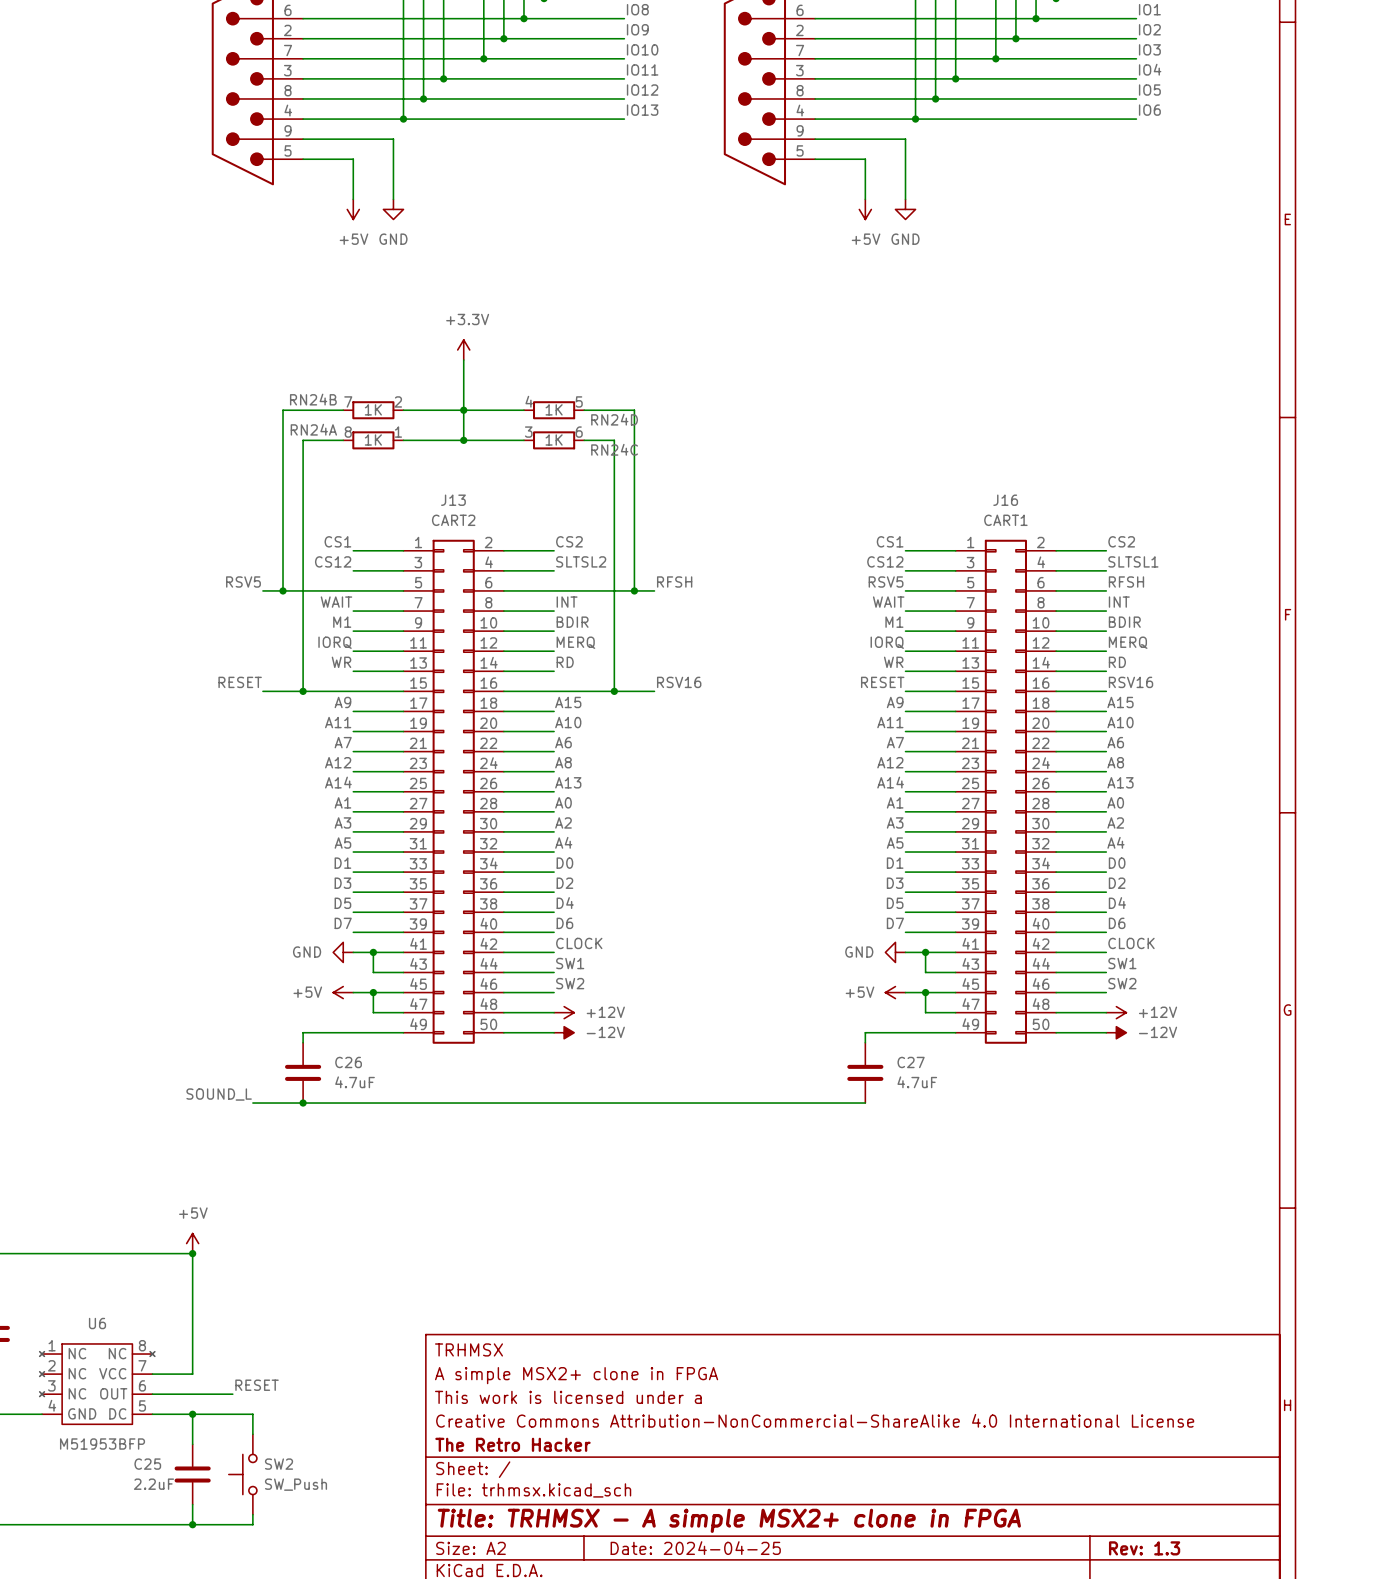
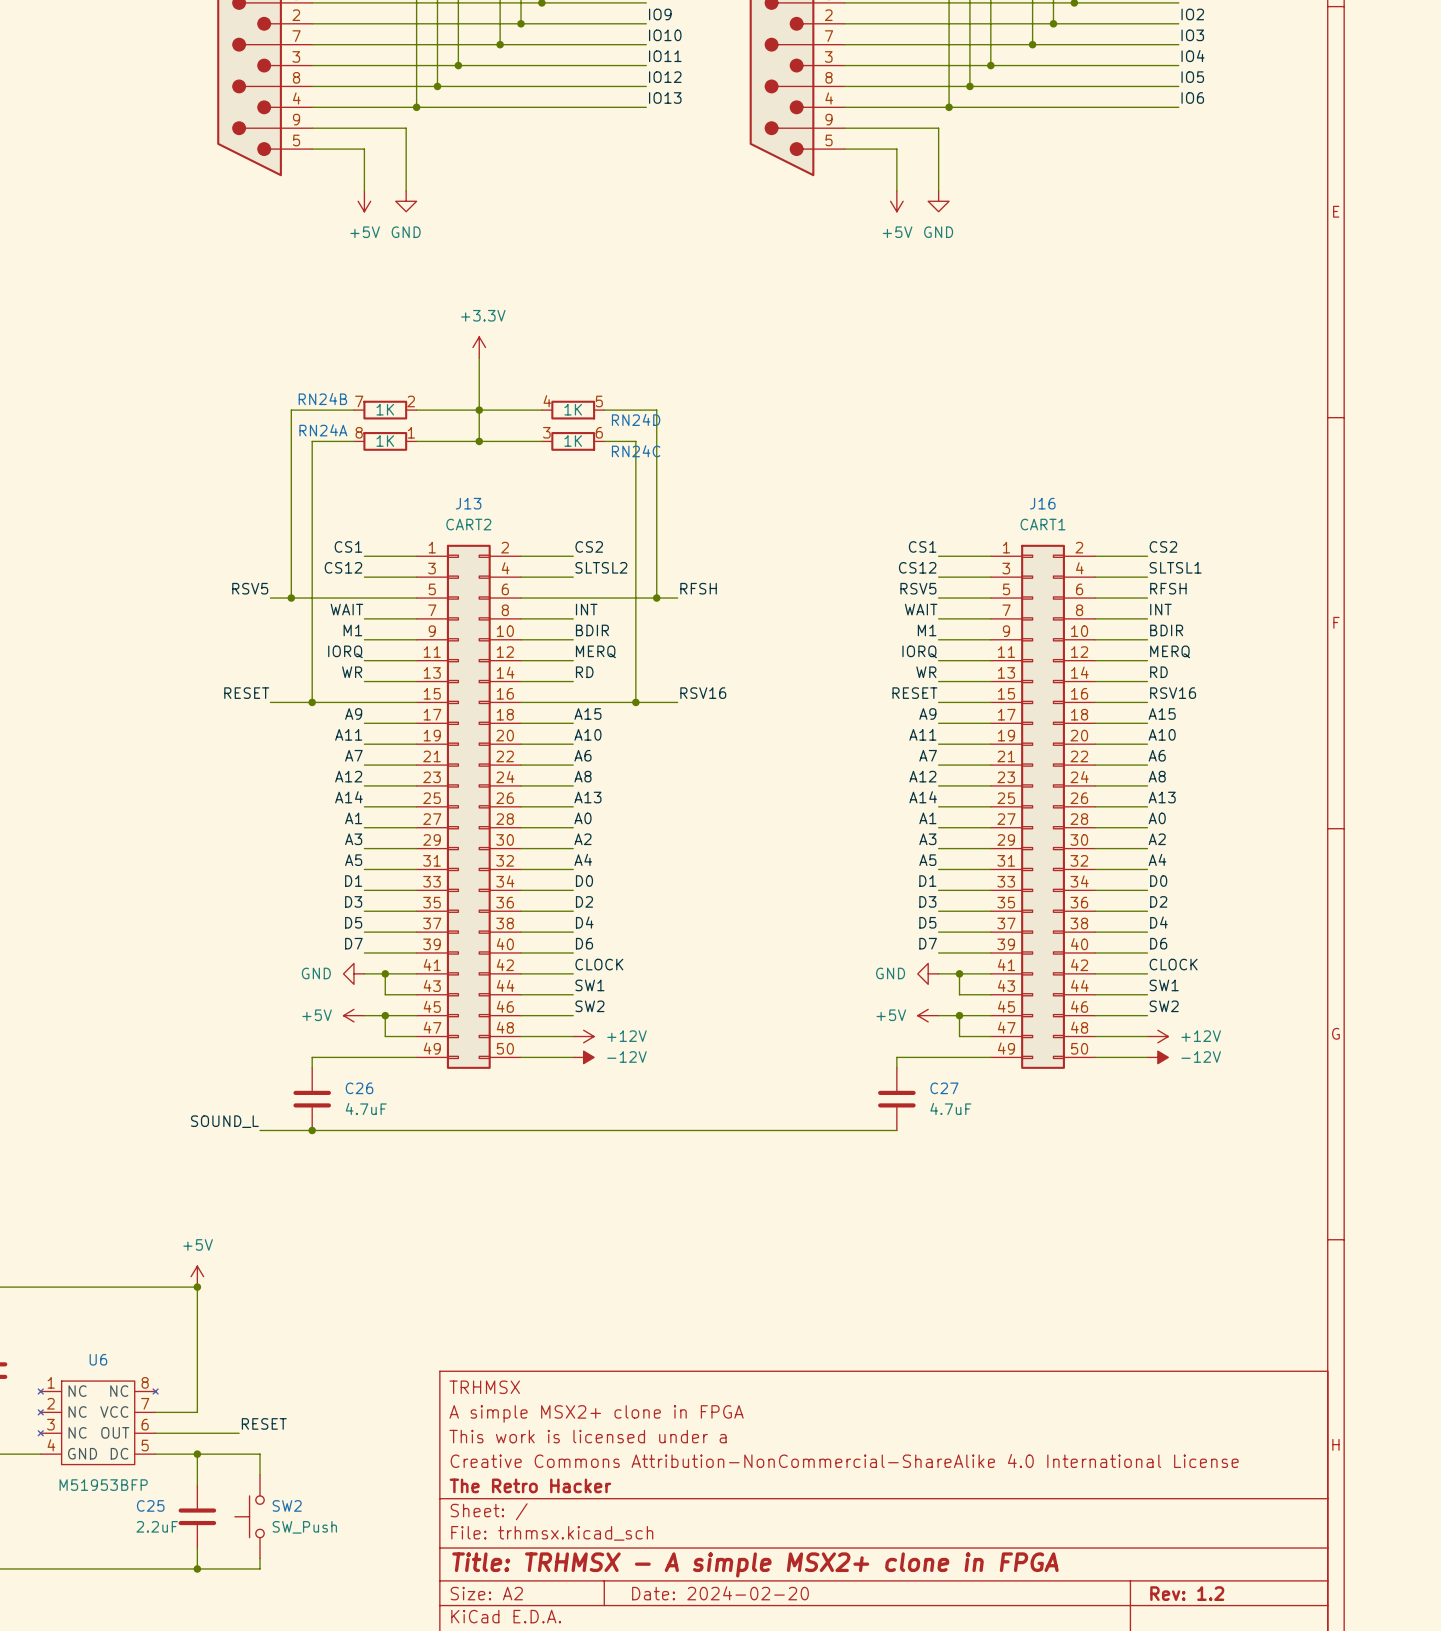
title block: Date: 2024-04-25 (695, 1548) -> Date: 2024-02-20 (720, 1593)
title block: Rev: 1.3 (1144, 1548) -> Rev: 1.2 (1187, 1593)

